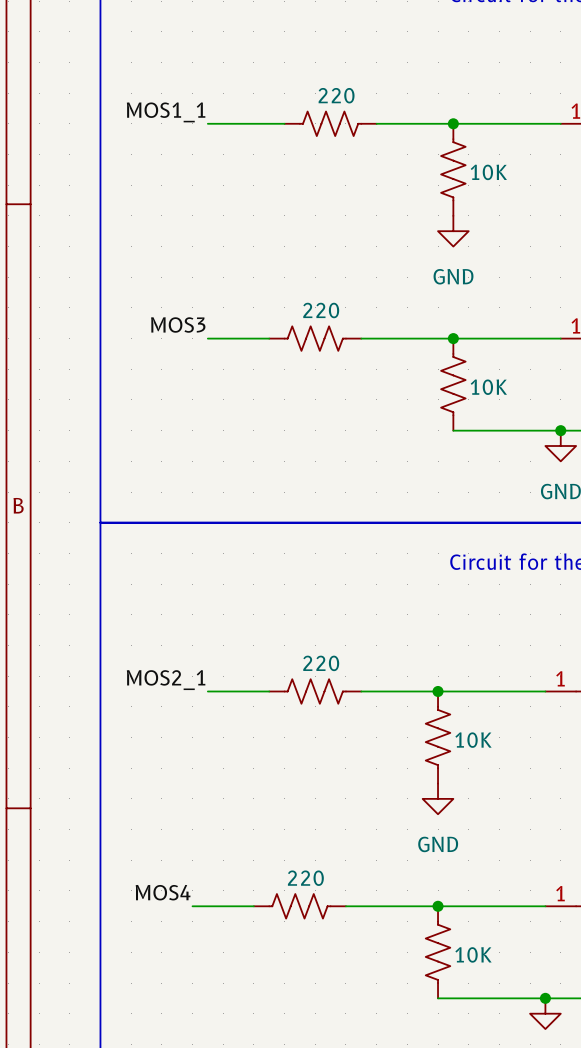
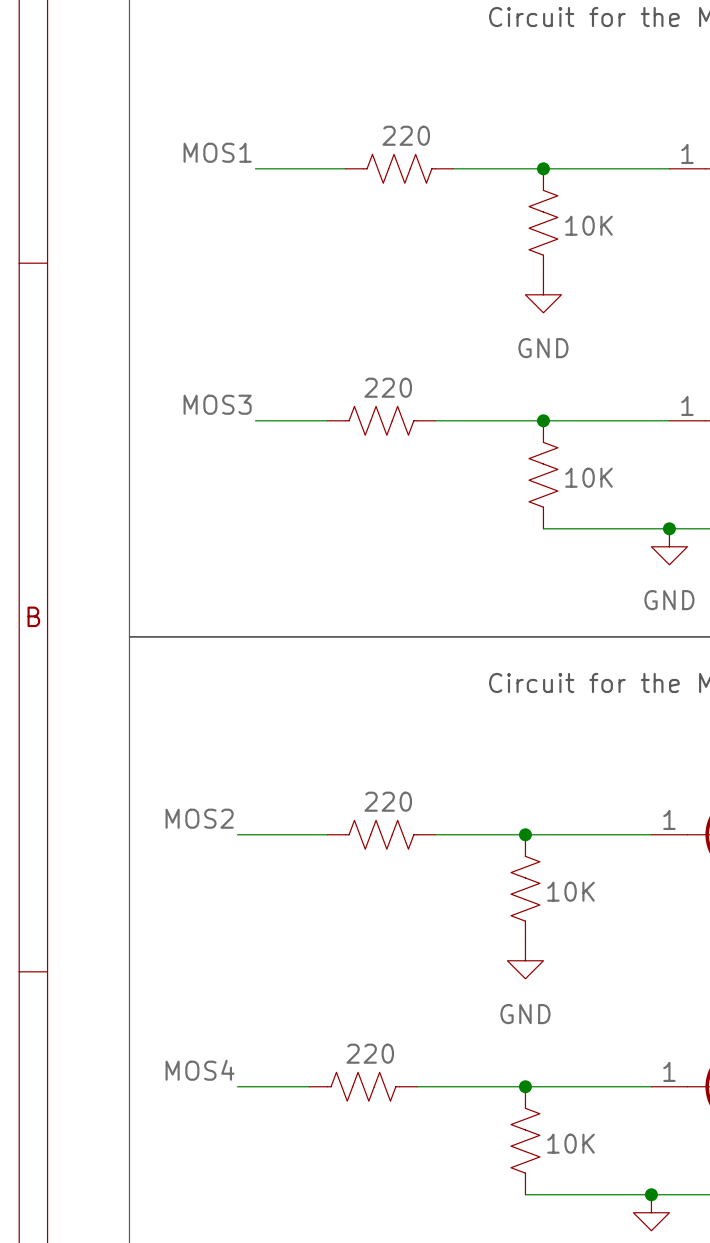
label: MOS1_1 (166, 112) -> MOS1 (217, 152)
label: MOS2_1 (166, 680) -> MOS2 (199, 818)
wire: none -> (237, 834) (255, 834)

